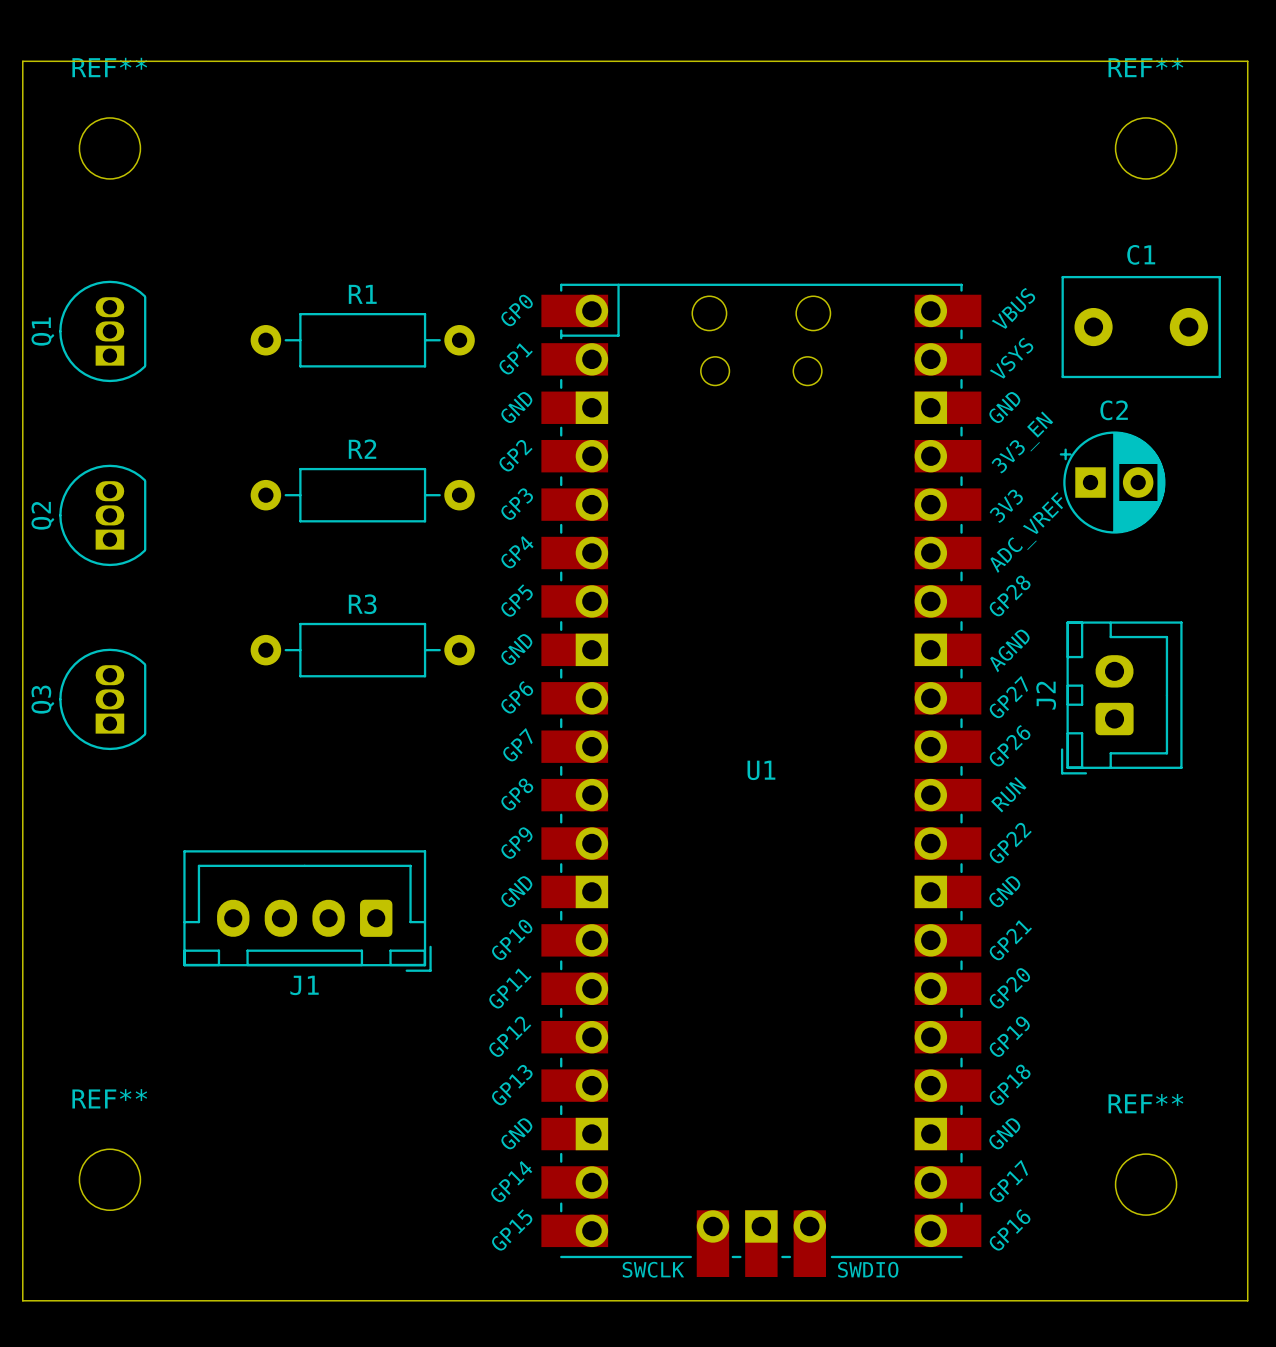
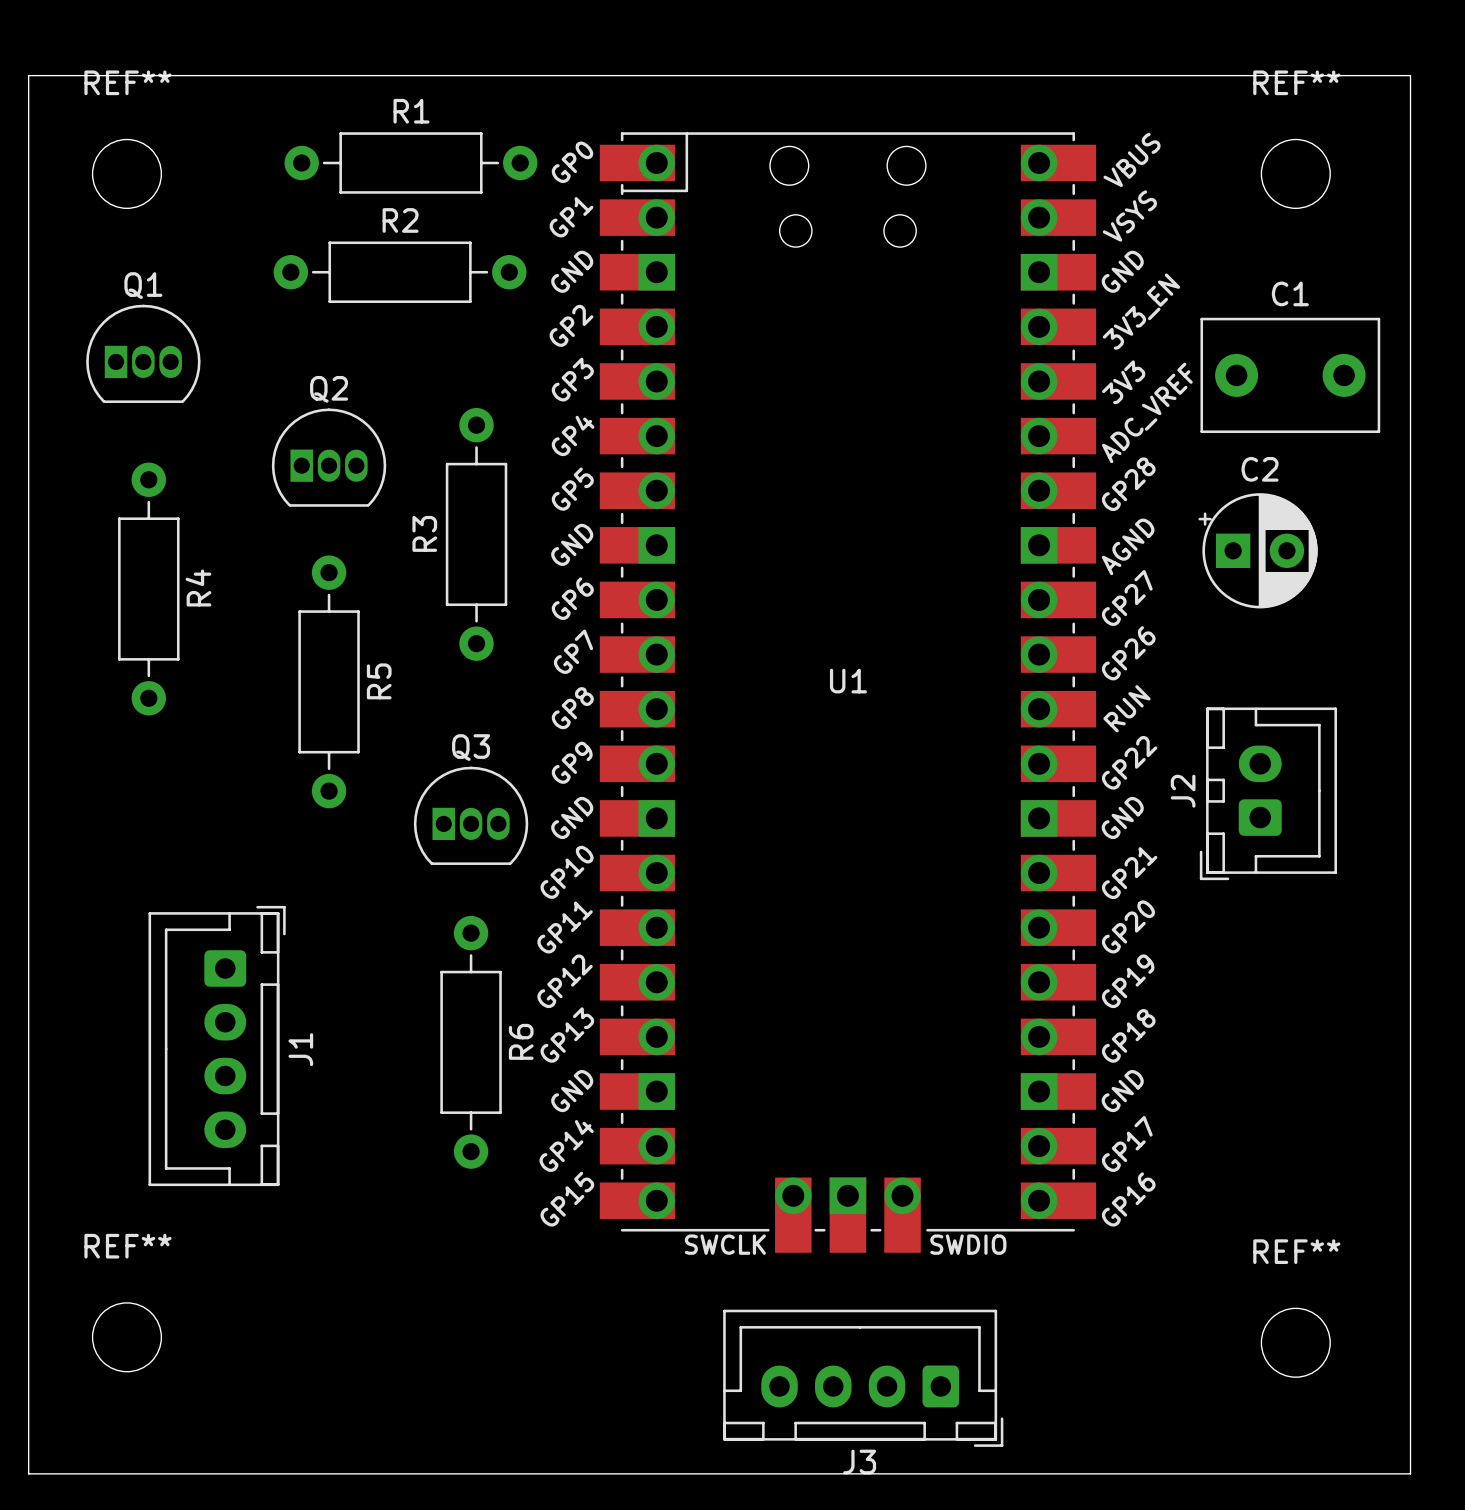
Q1 rotation: 0° (102, 331) -> 90° clockwise (143, 353)
R1 position: (362, 340) -> (410, 163)
R2 position: (362, 495) -> (400, 272)
Q2 rotation: 0° (102, 515) -> 90° clockwise (329, 457)
Q2 position: (102, 515) -> (329, 457)
R4: none -> (148, 589)
R5: none -> (329, 681)
R3 name position: R3 (362, 604) -> R3 (424, 533)
R3 rotation: 0° (362, 650) -> 90° clockwise (476, 534)
R3 position: (362, 650) -> (476, 534)
Q3 rotation: 0° (102, 699) -> 90° clockwise (471, 815)
Q3 position: (102, 699) -> (471, 815)
U1 position: (761, 780) -> (847, 692)
J1 rotation: 0° (307, 911) -> 90° counterclockwise (217, 1046)
R6: none -> (471, 1042)
J3: none -> (863, 1378)

